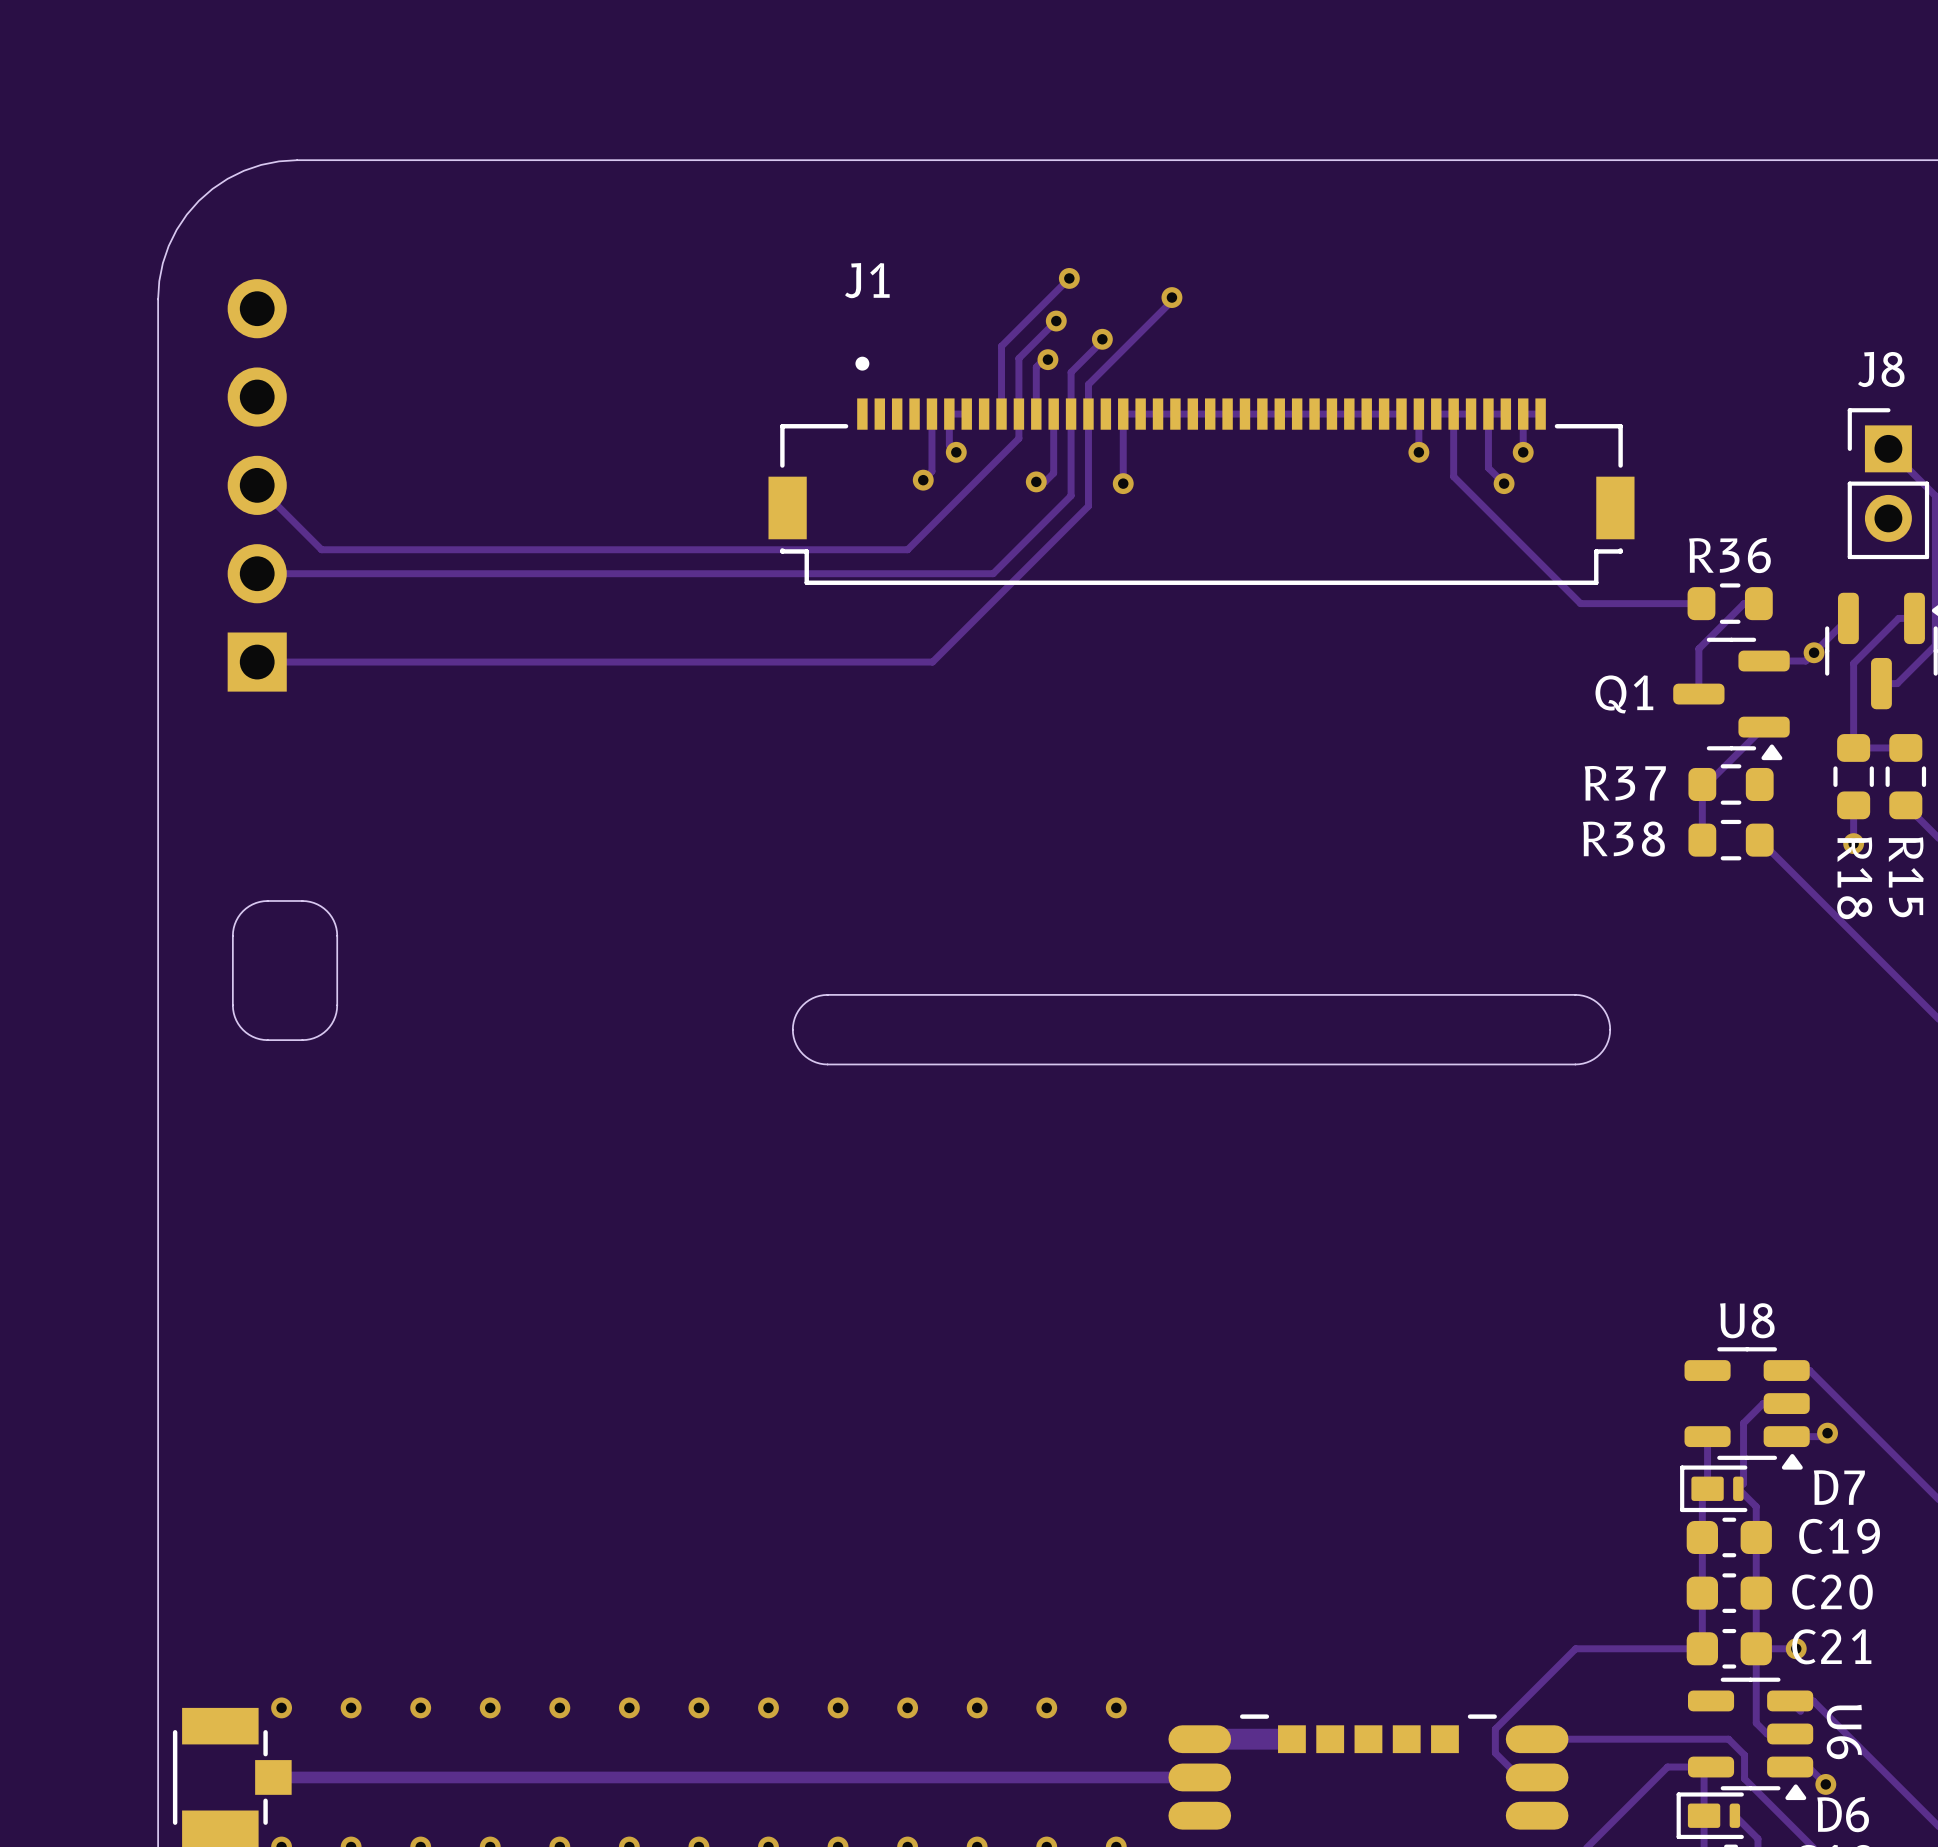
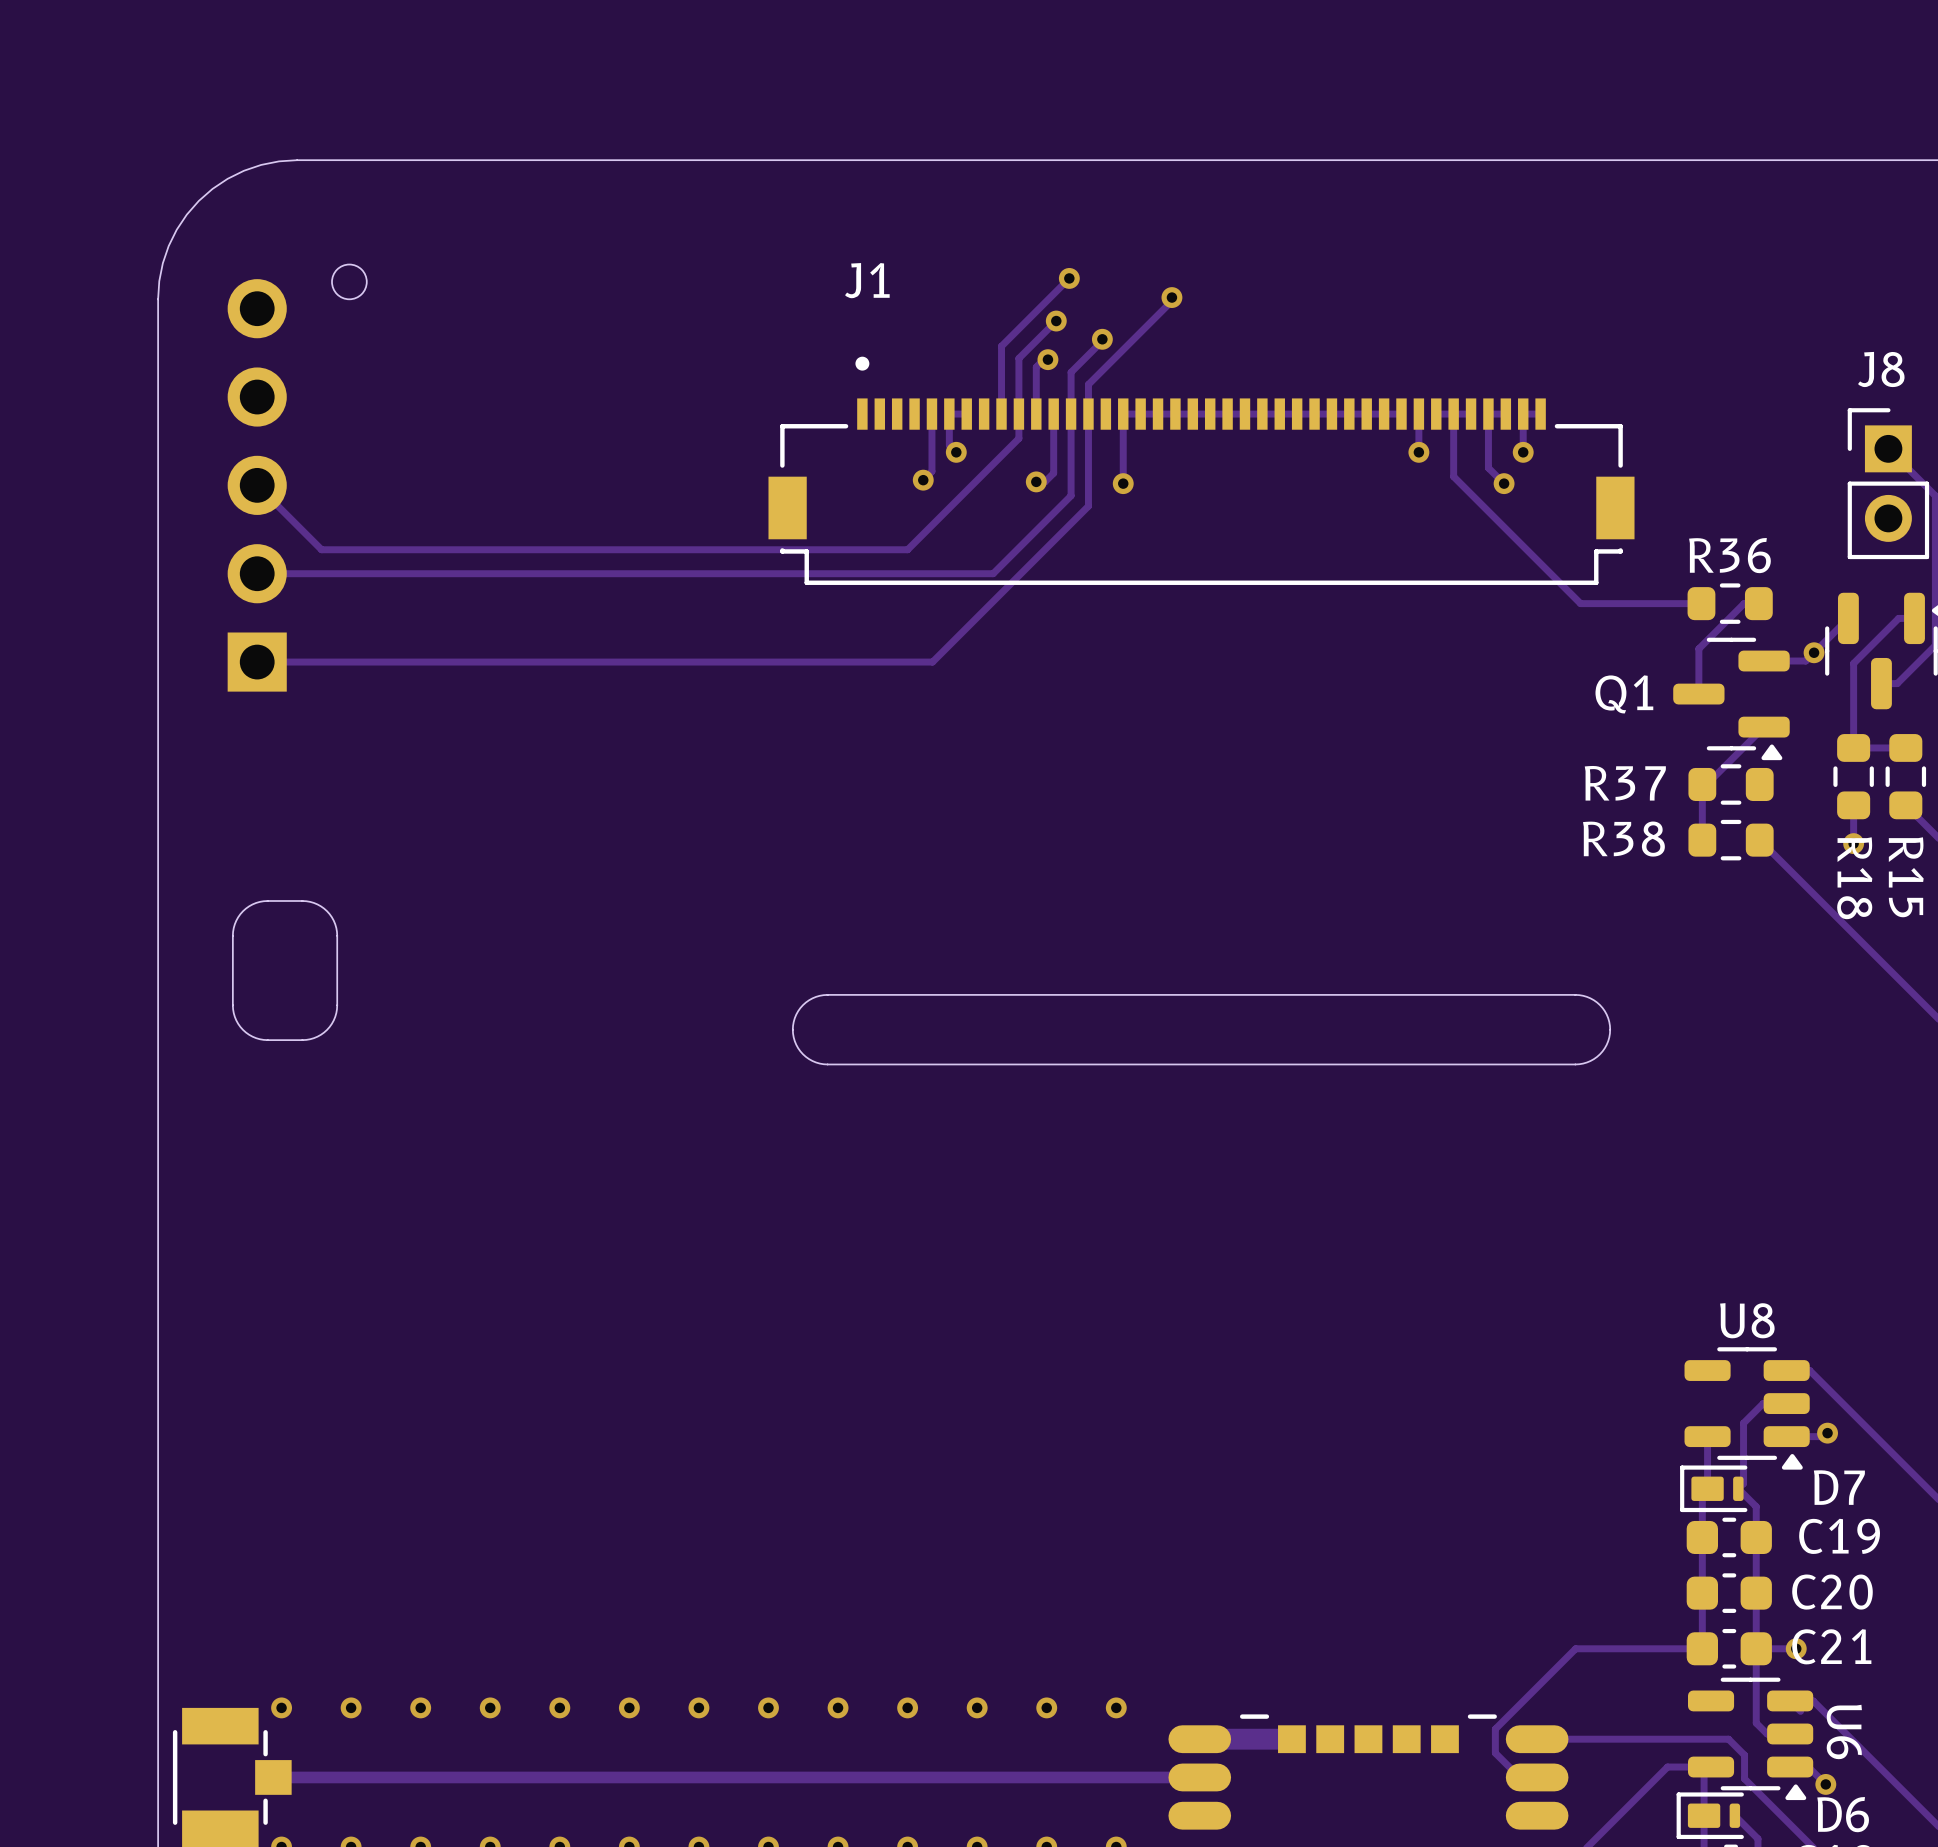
round board edge: none -> [331, 263, 368, 301]

